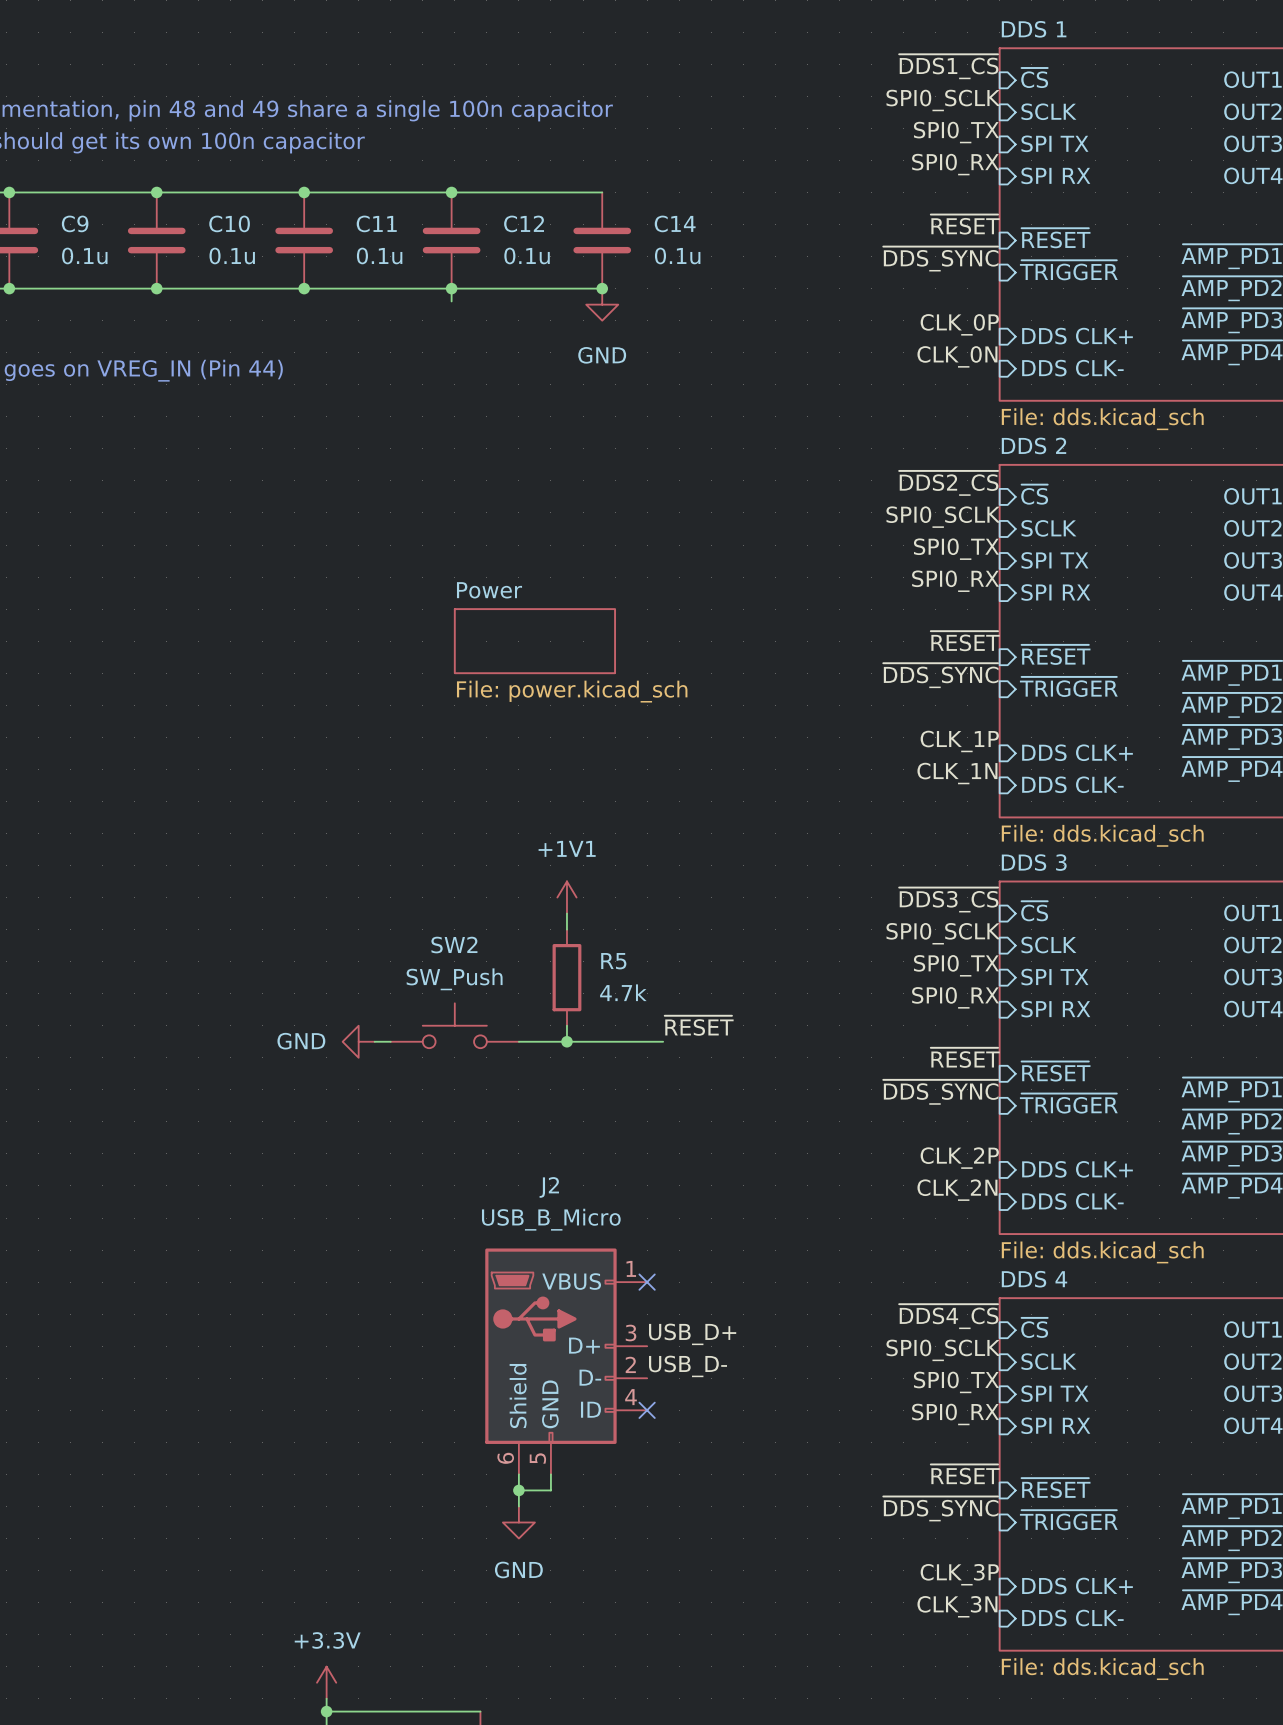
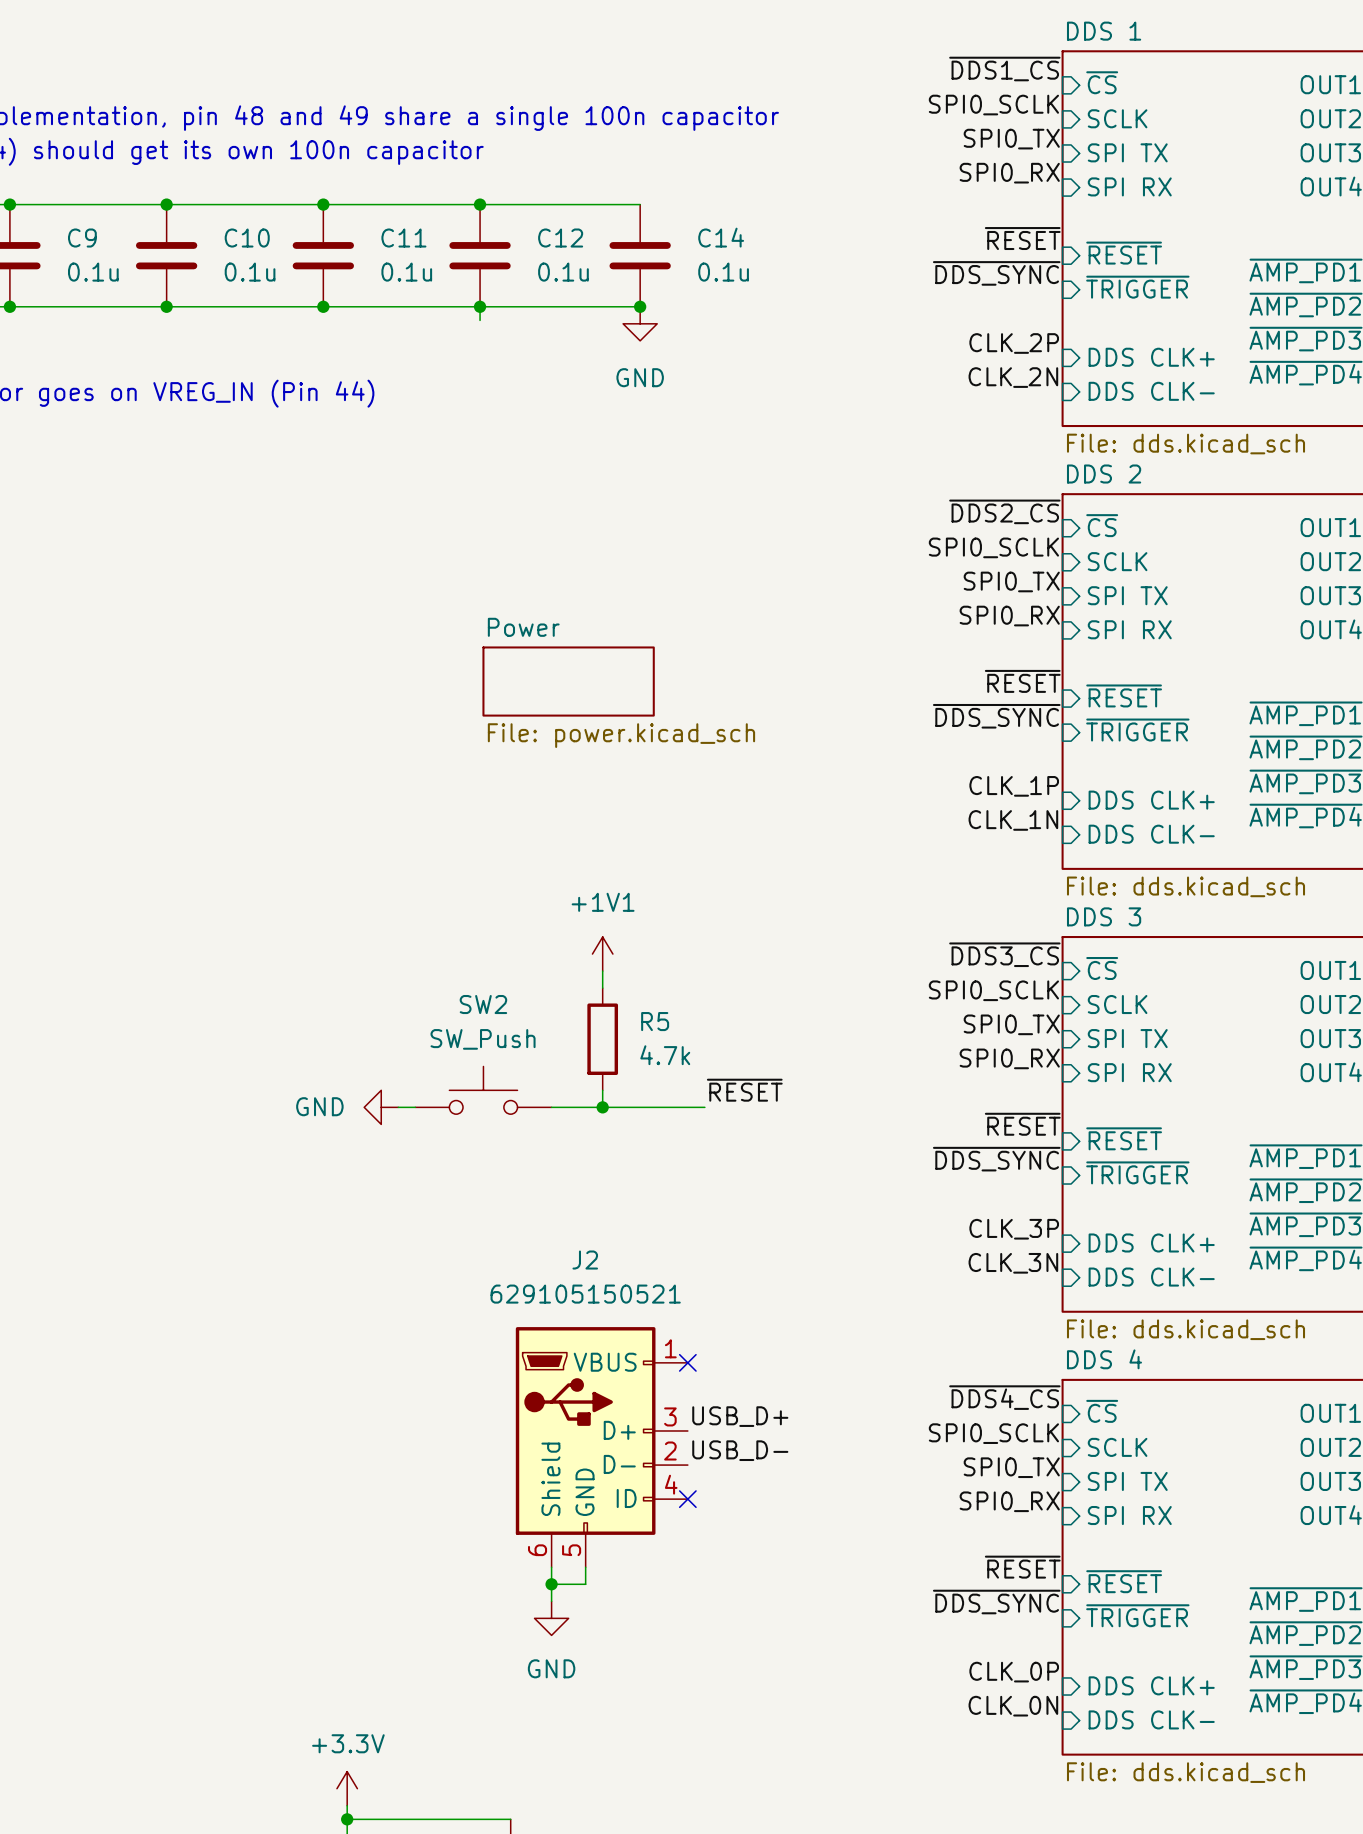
label: CLK_0P (959, 324) -> CLK_2P (1014, 343)
label: CLK_0N (957, 356) -> CLK_2N (1013, 377)
label: CLK_2P (959, 1158) -> CLK_3P (1014, 1229)
label: CLK_2N (957, 1190) -> CLK_3N (1013, 1263)
J2 value: USB_B_Micro (551, 1219) -> 629105150521 (585, 1294)
label: CLK_3P (959, 1574) -> CLK_0P (1014, 1672)
label: CLK_3N (957, 1606) -> CLK_0N (1013, 1706)

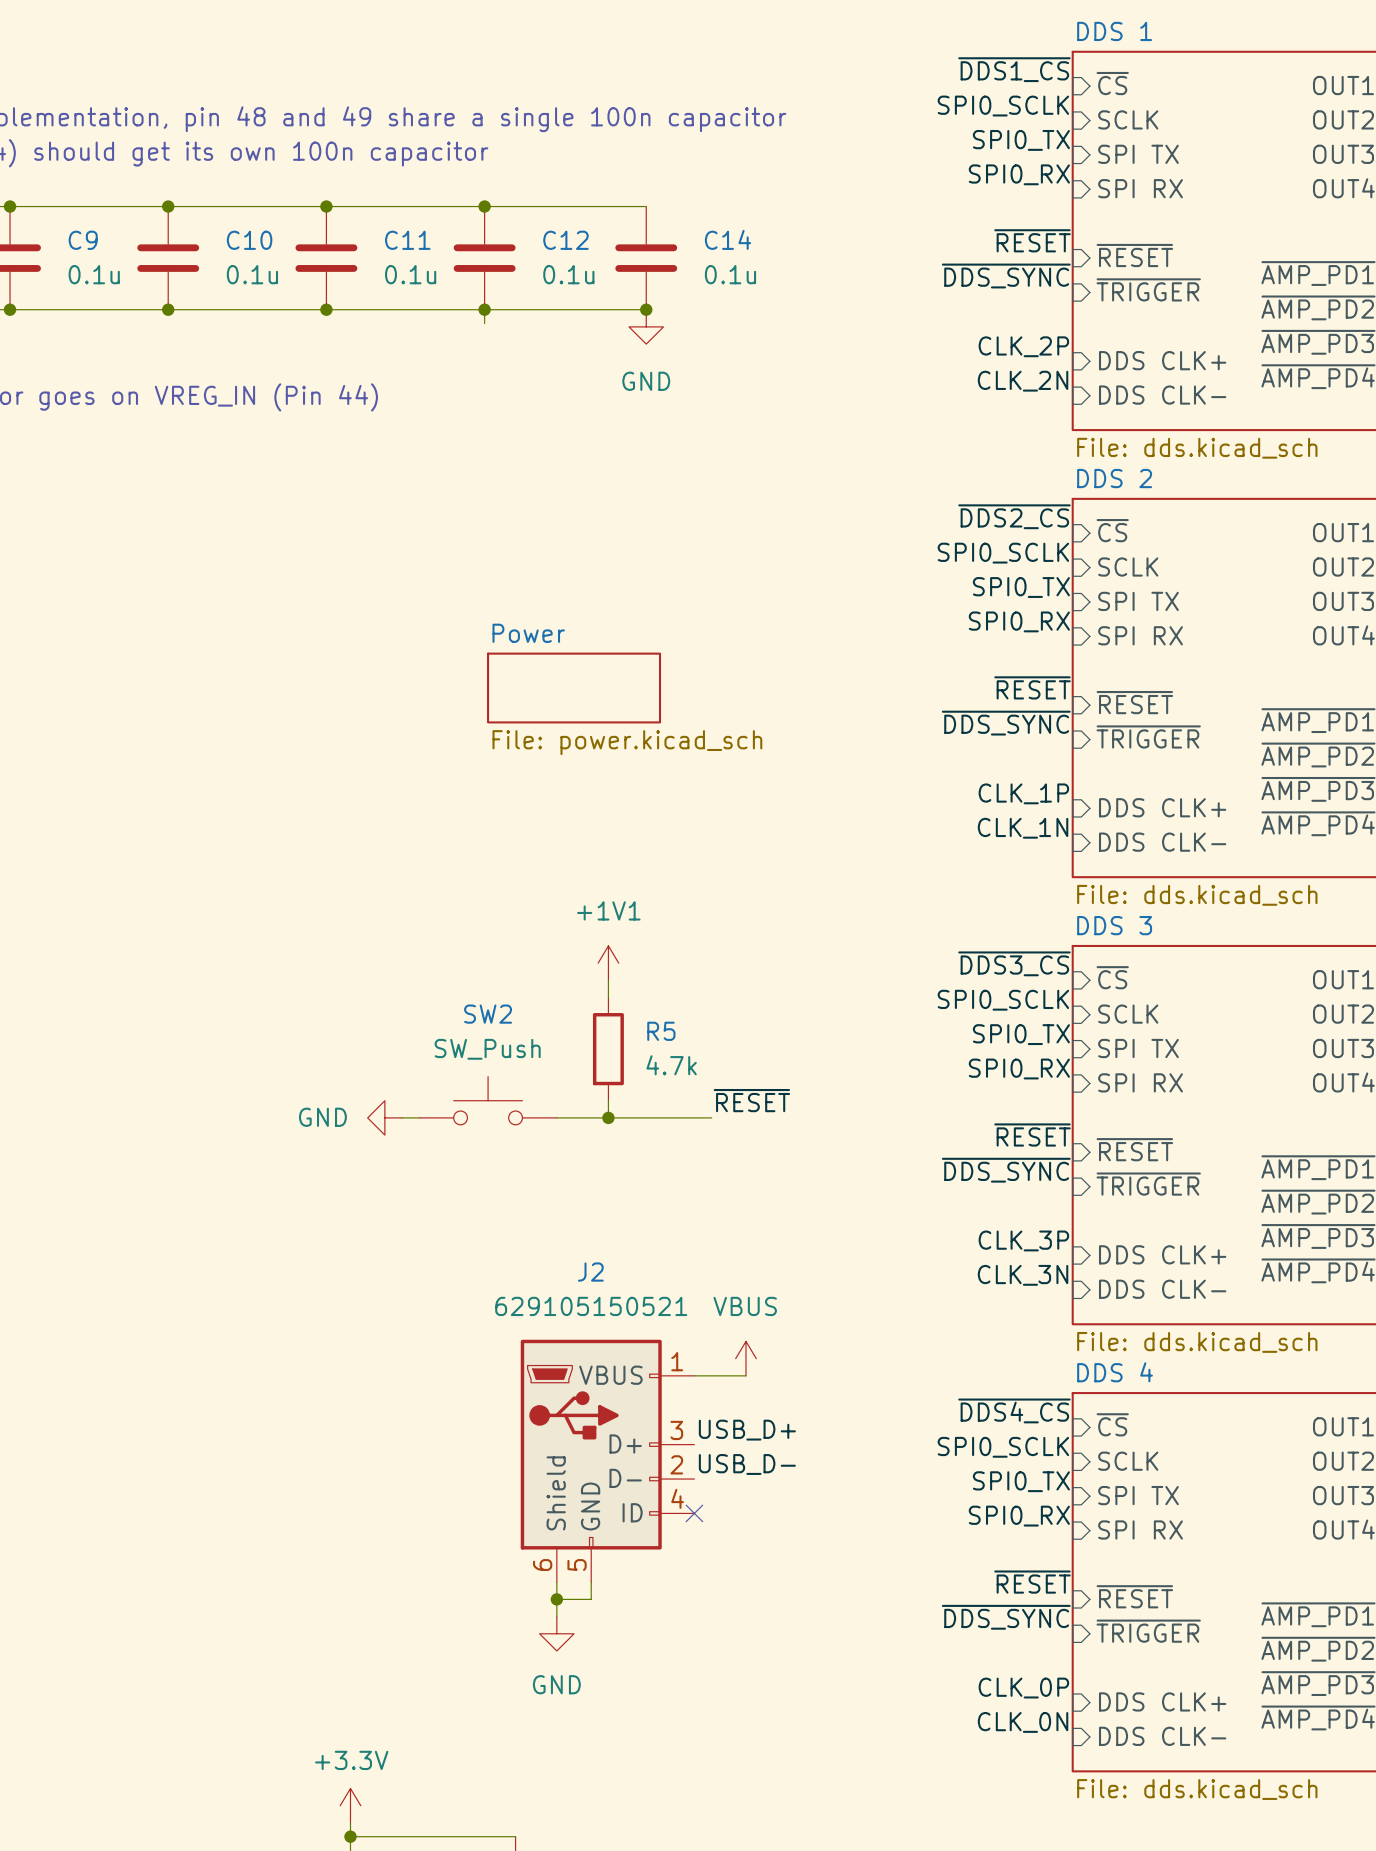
power symbol: none -> VBUS (745, 1358)
wire: none -> (694, 1375) (745, 1375)
no-connect mark: (687, 1362) -> none

